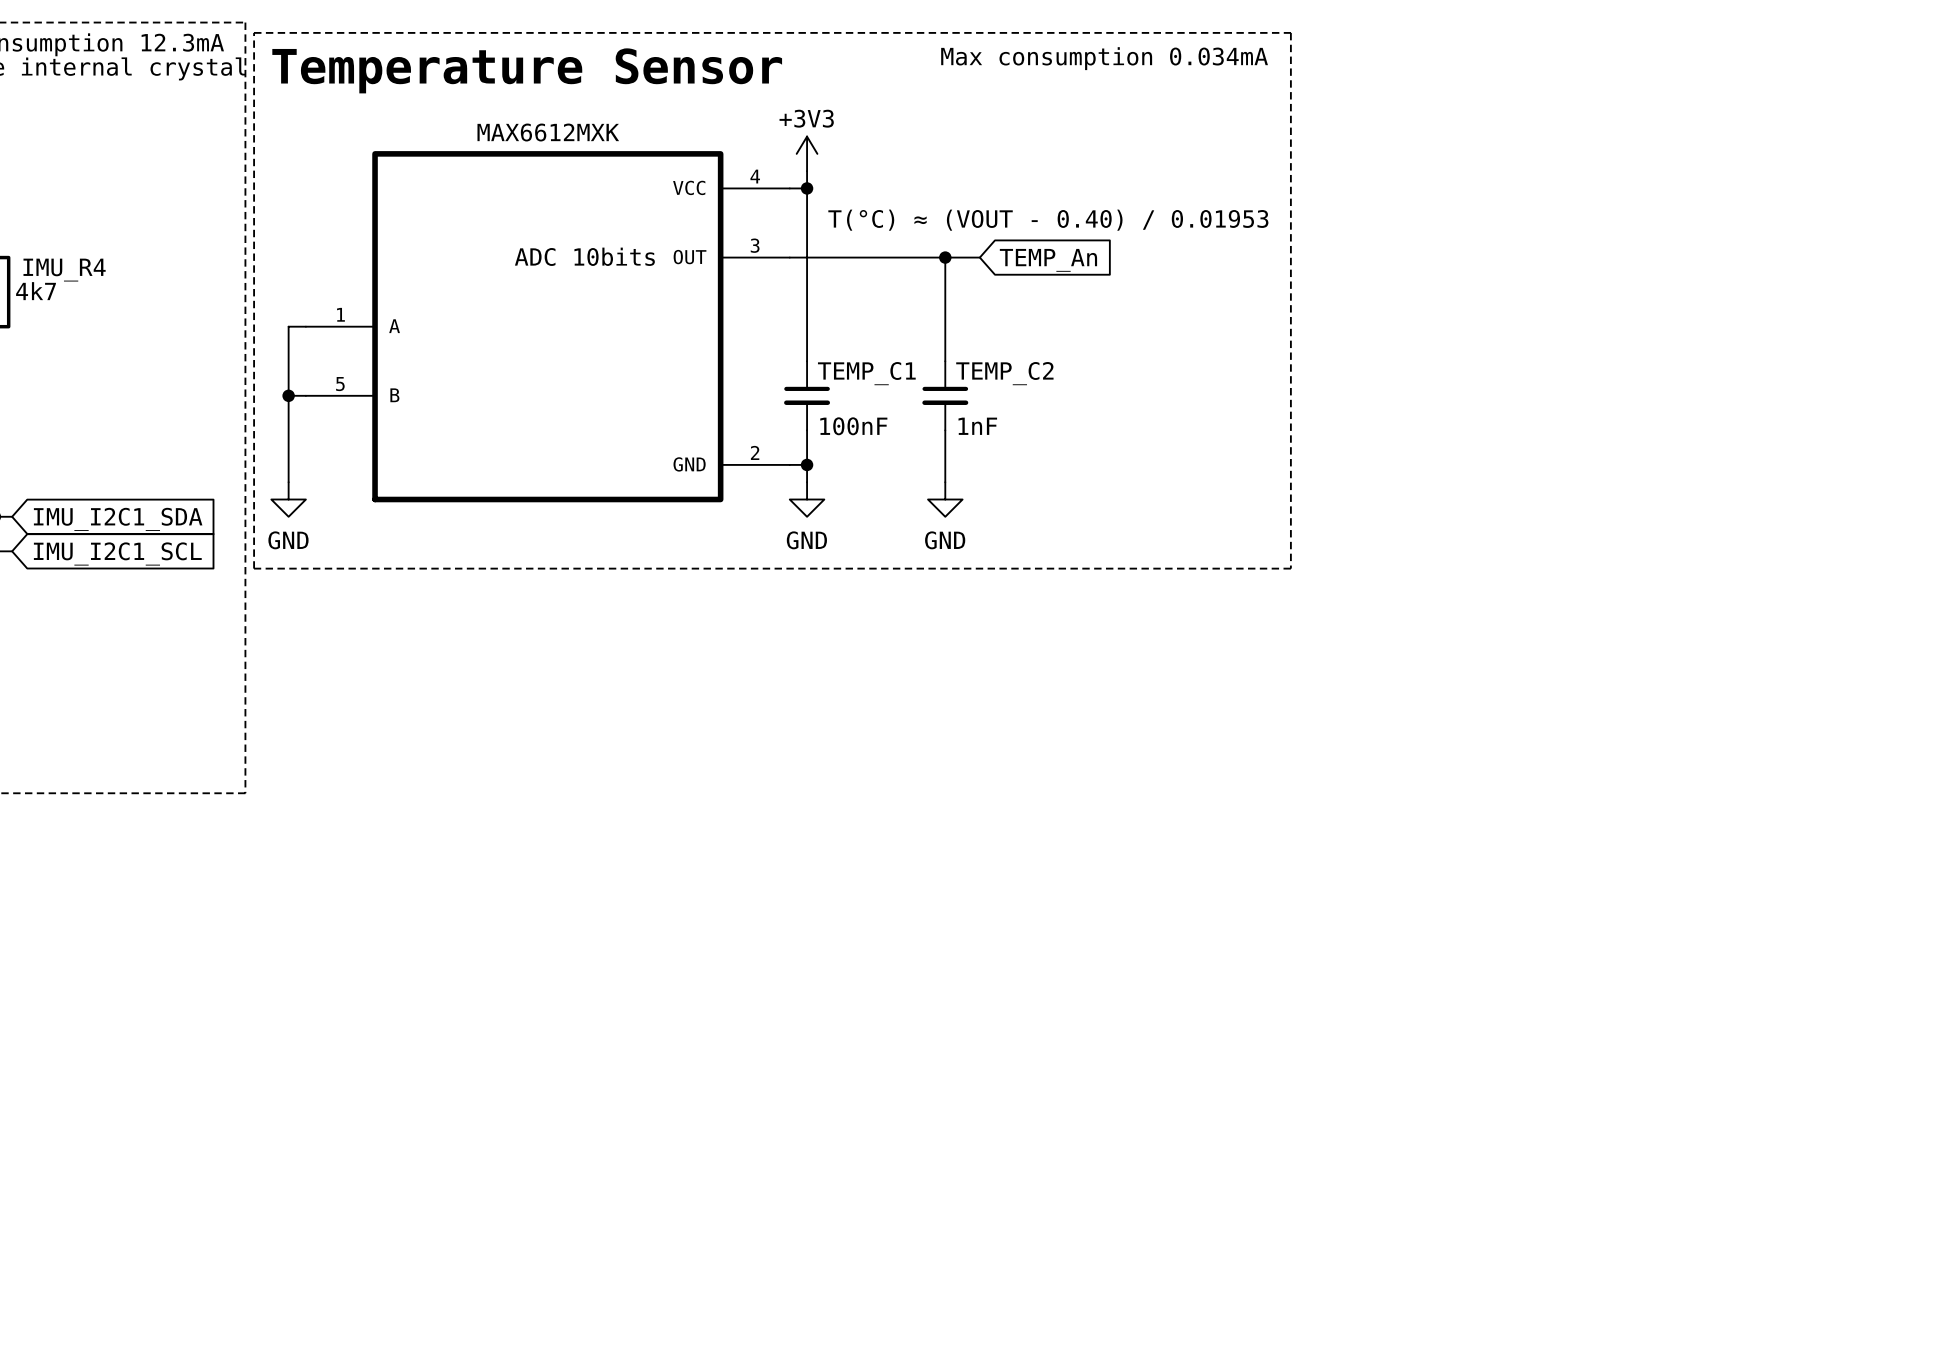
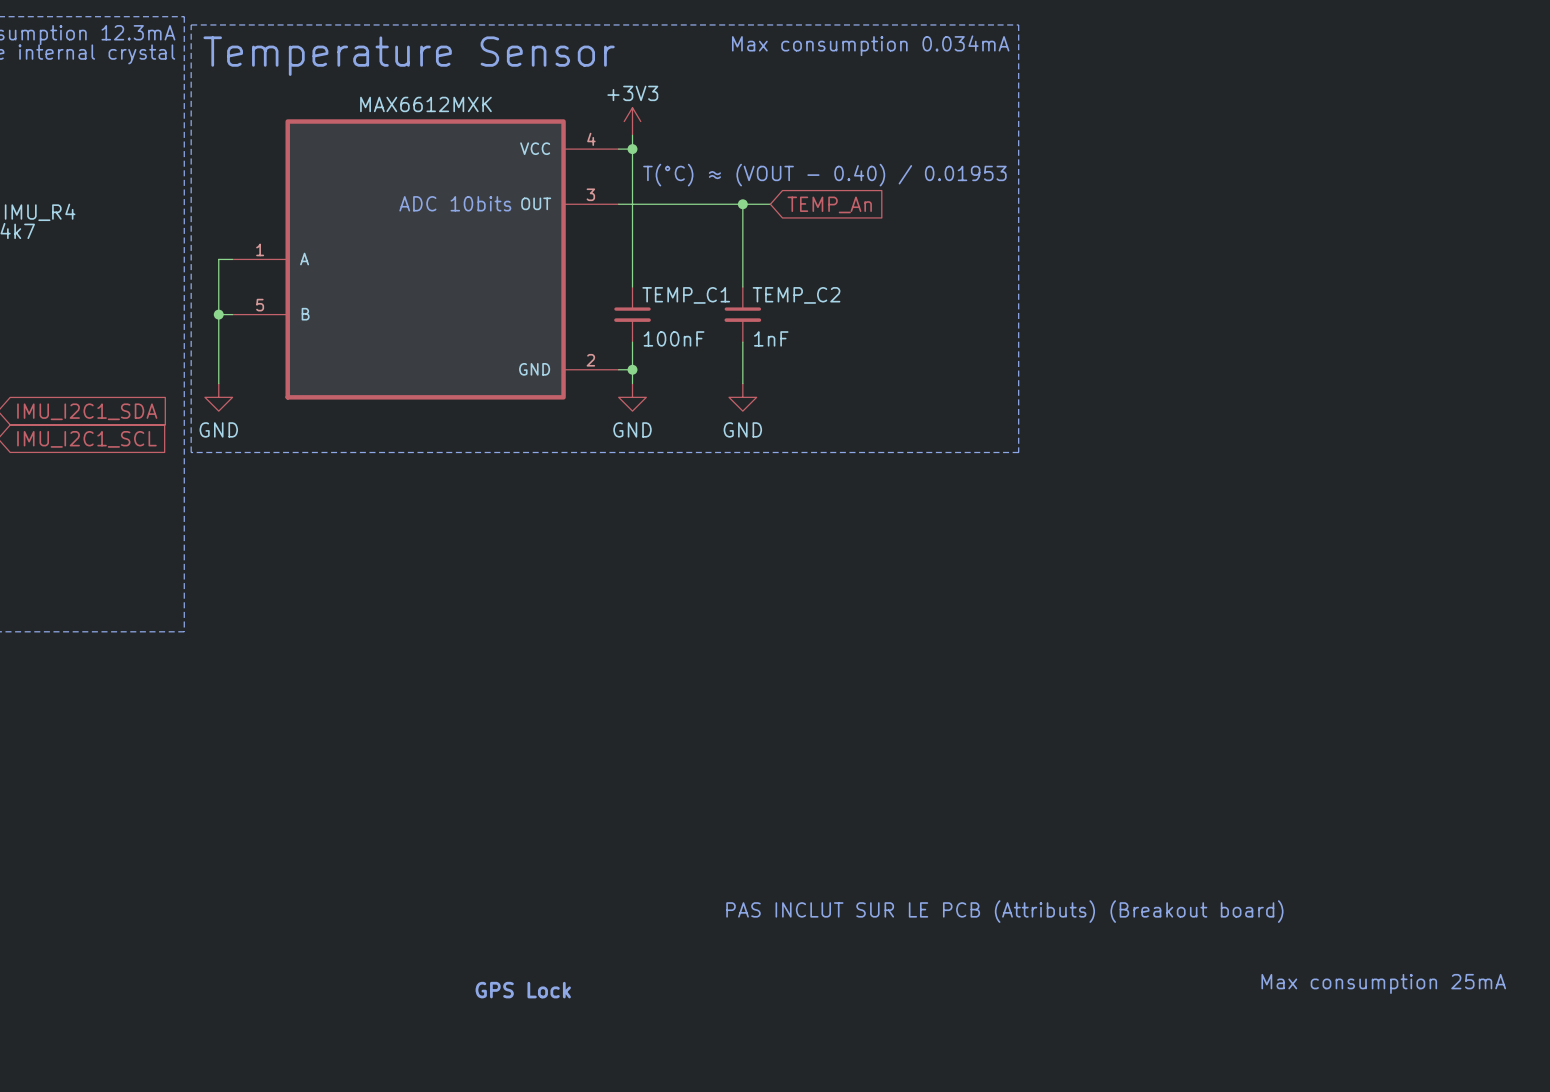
text: none -> PAS INCLUT SUR LE PCB (Attributs) (Breakout board) (1004, 911)
text: none -> Max consumption 25mA (1383, 983)
text: none -> GPS Lock (523, 990)

